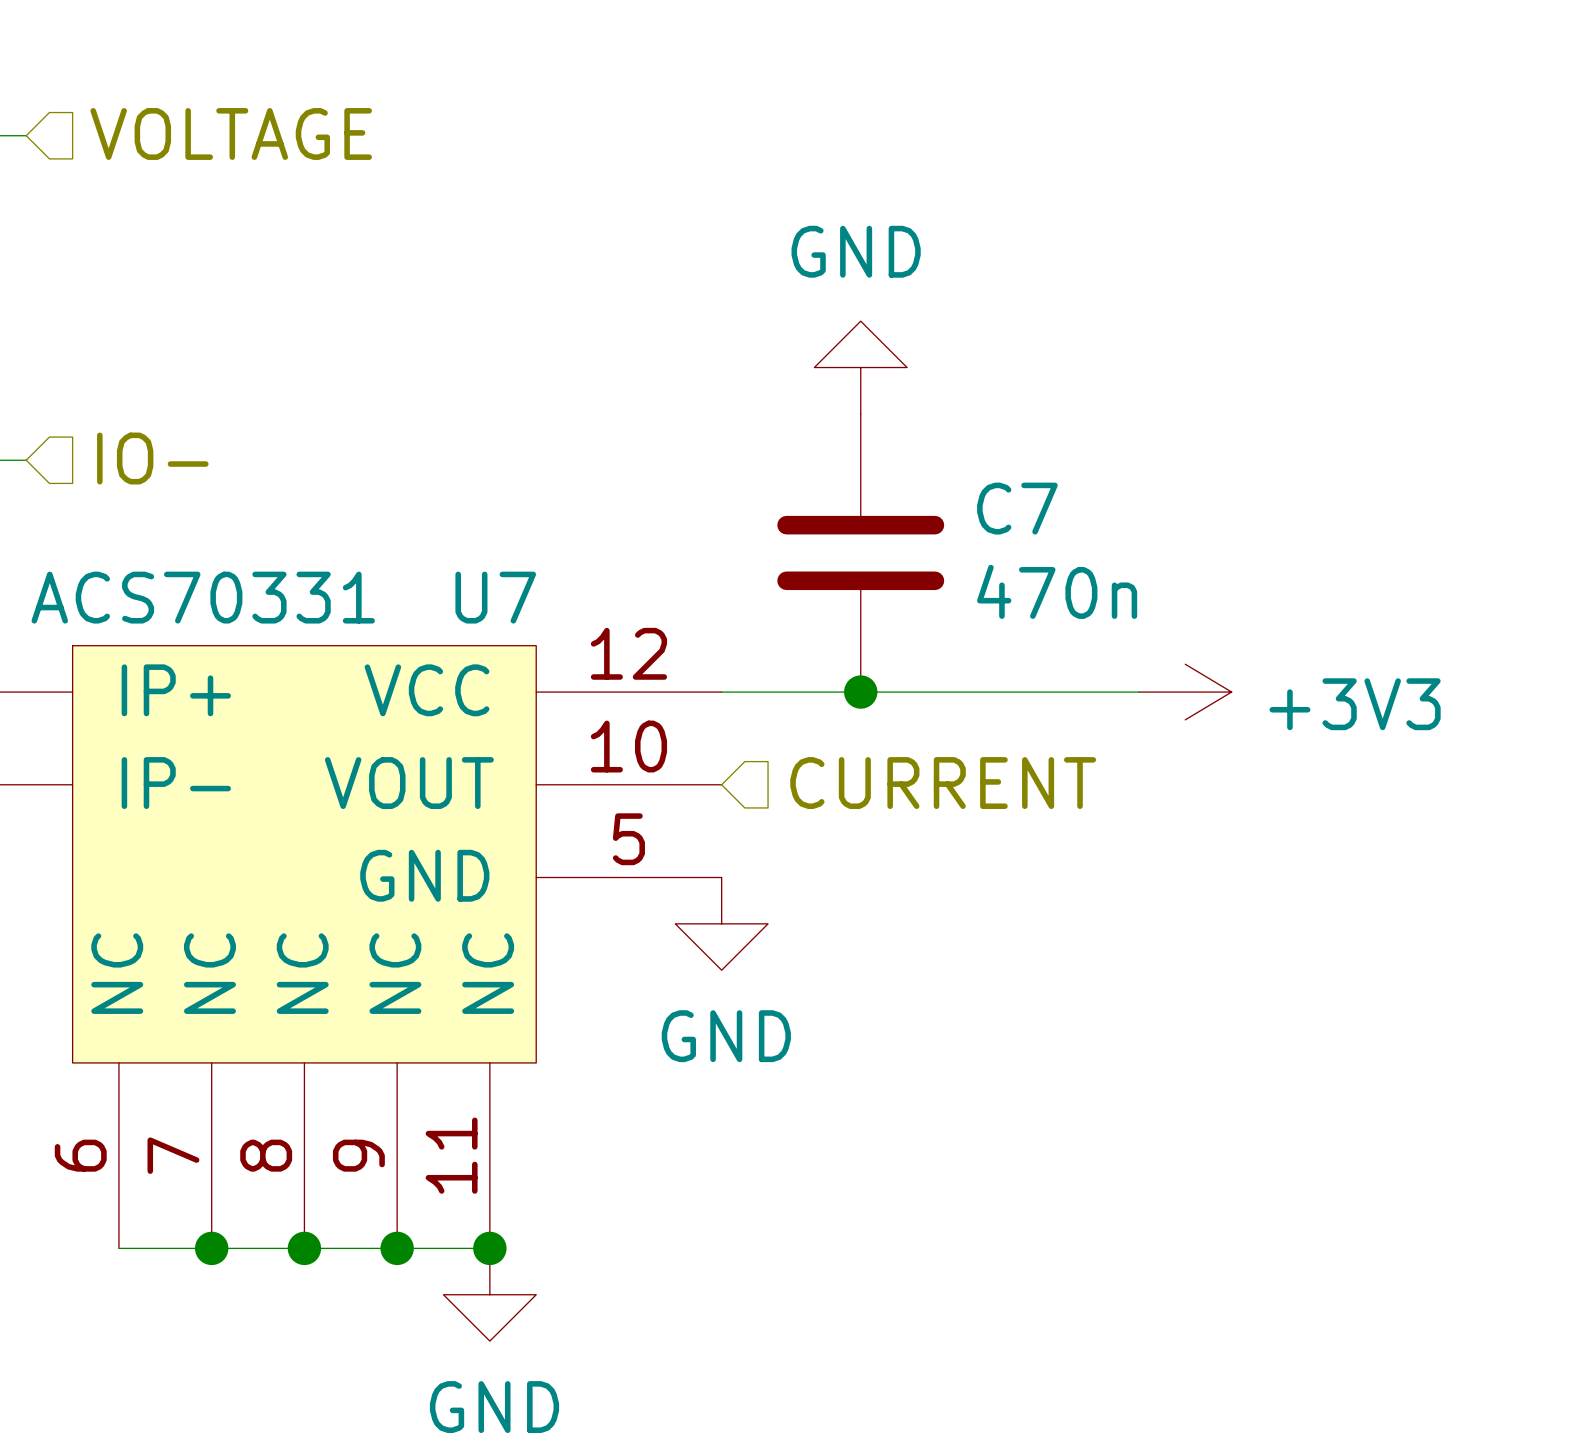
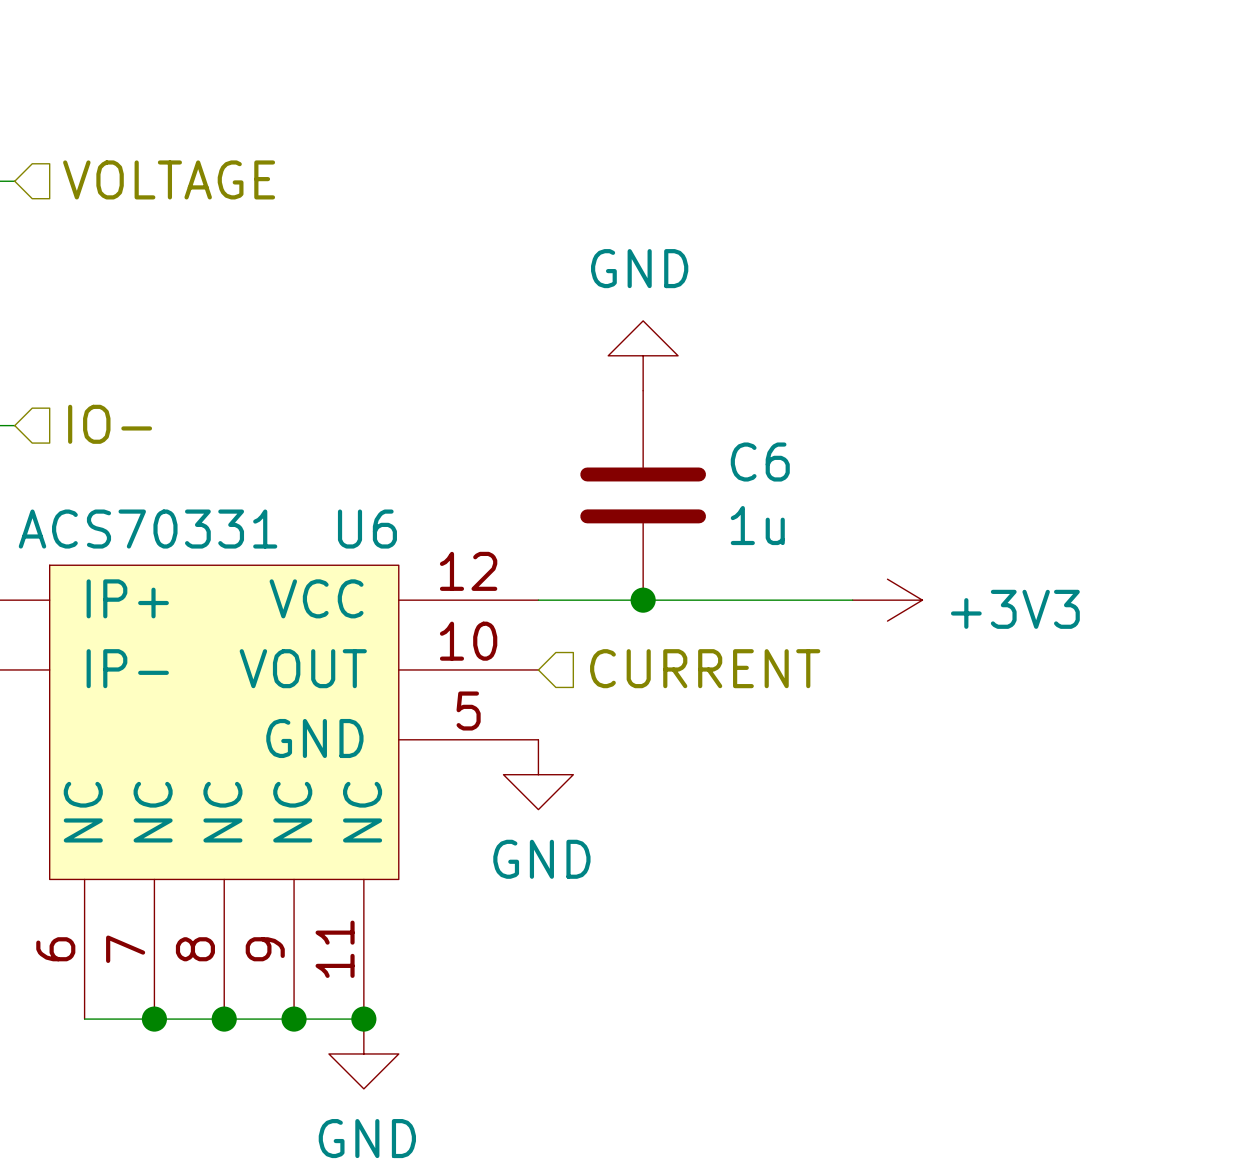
C7 name: C7 (1017, 508) -> C6 (760, 462)
C7 value: 470n (1057, 591) -> 1u (757, 525)
U7 name: U7 (495, 597) -> U6 (367, 529)

